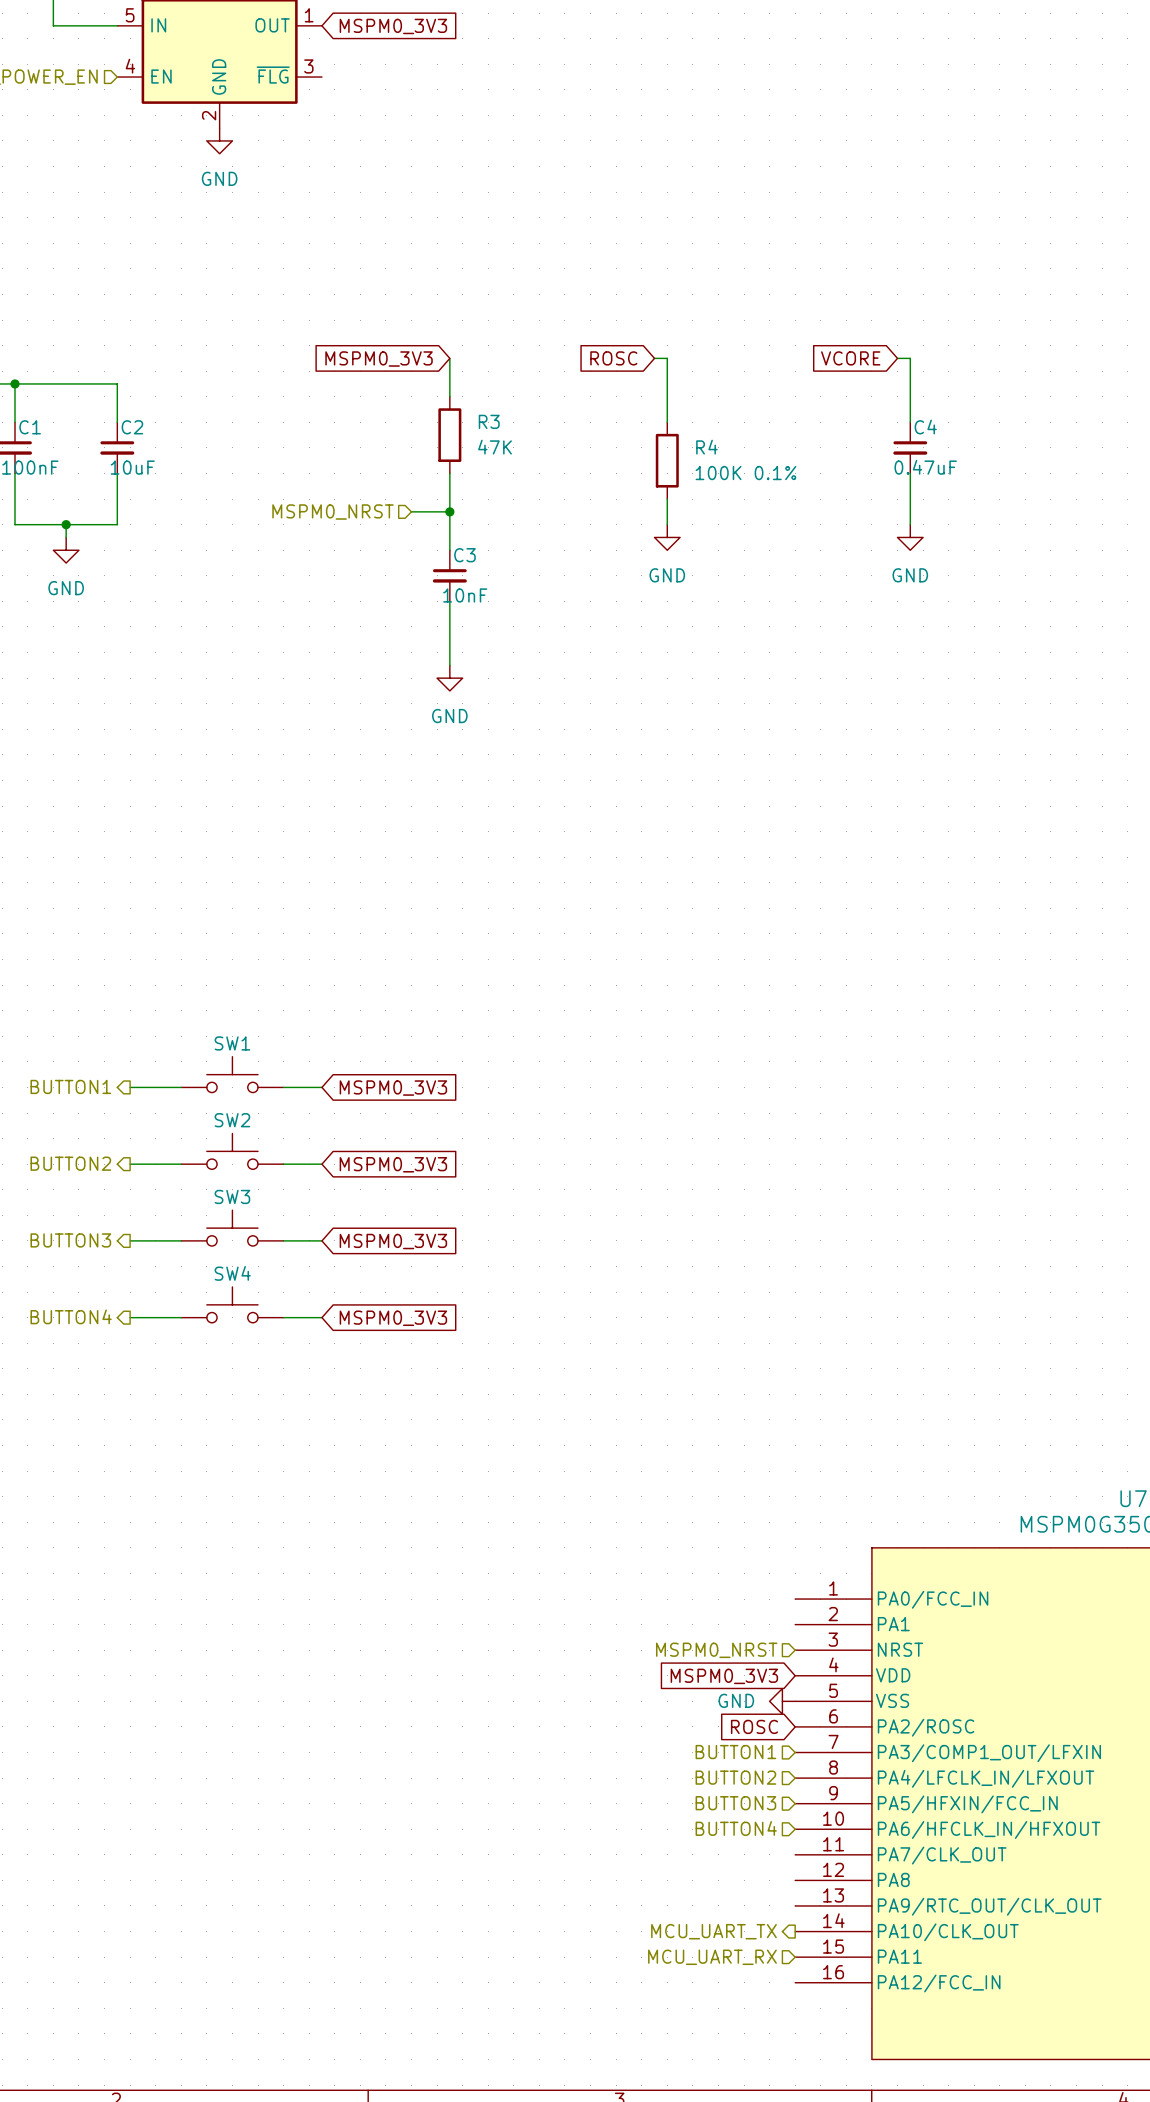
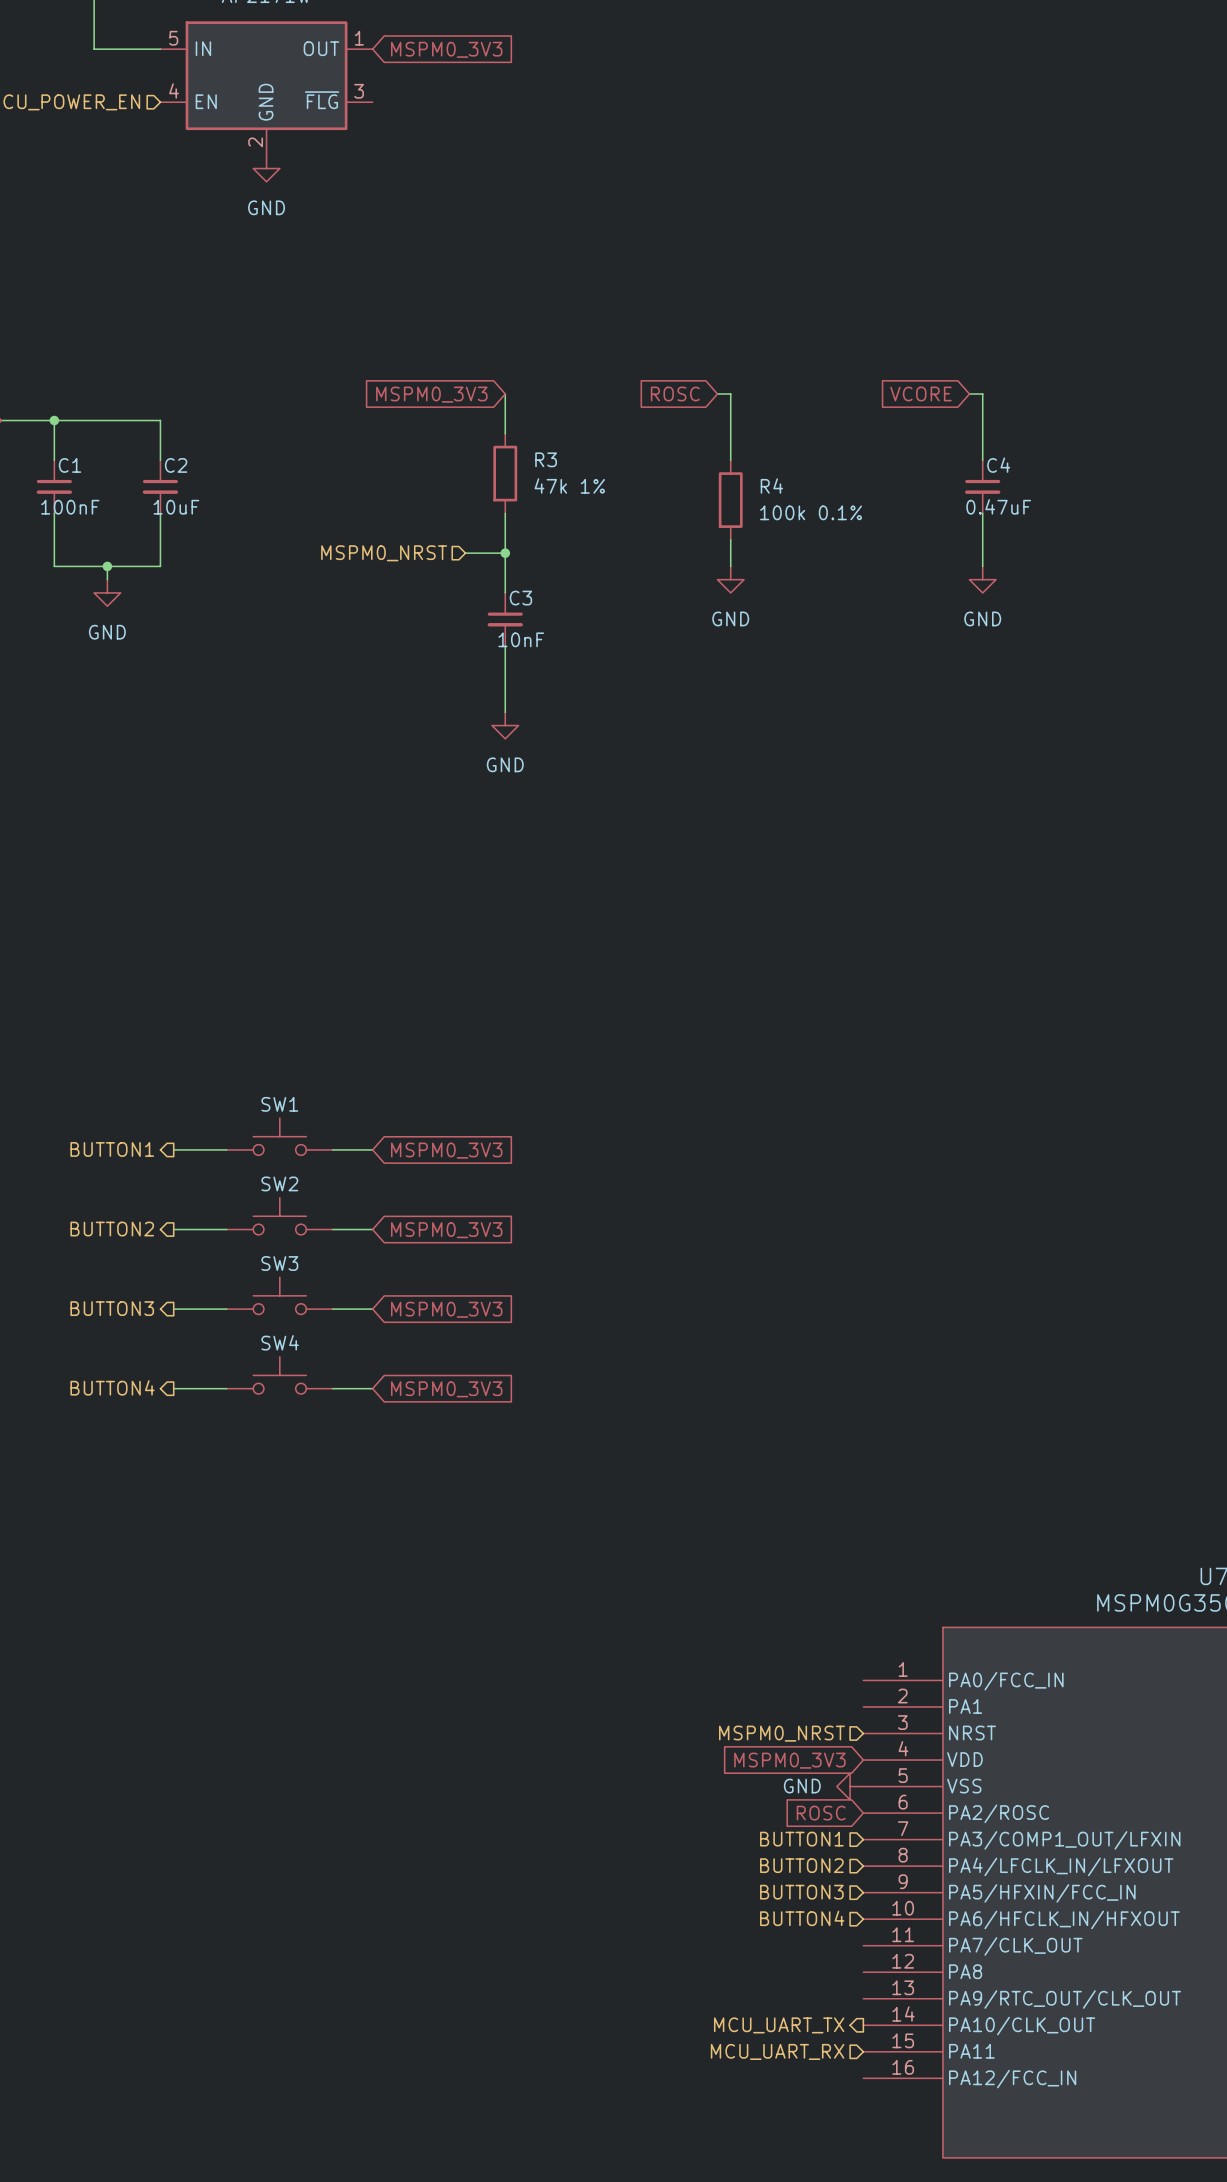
R3 value: 47K (495, 447) -> 47k 1% (569, 486)
R4 value: 100K 0.1% (745, 473) -> 100k 0.1% (811, 512)

